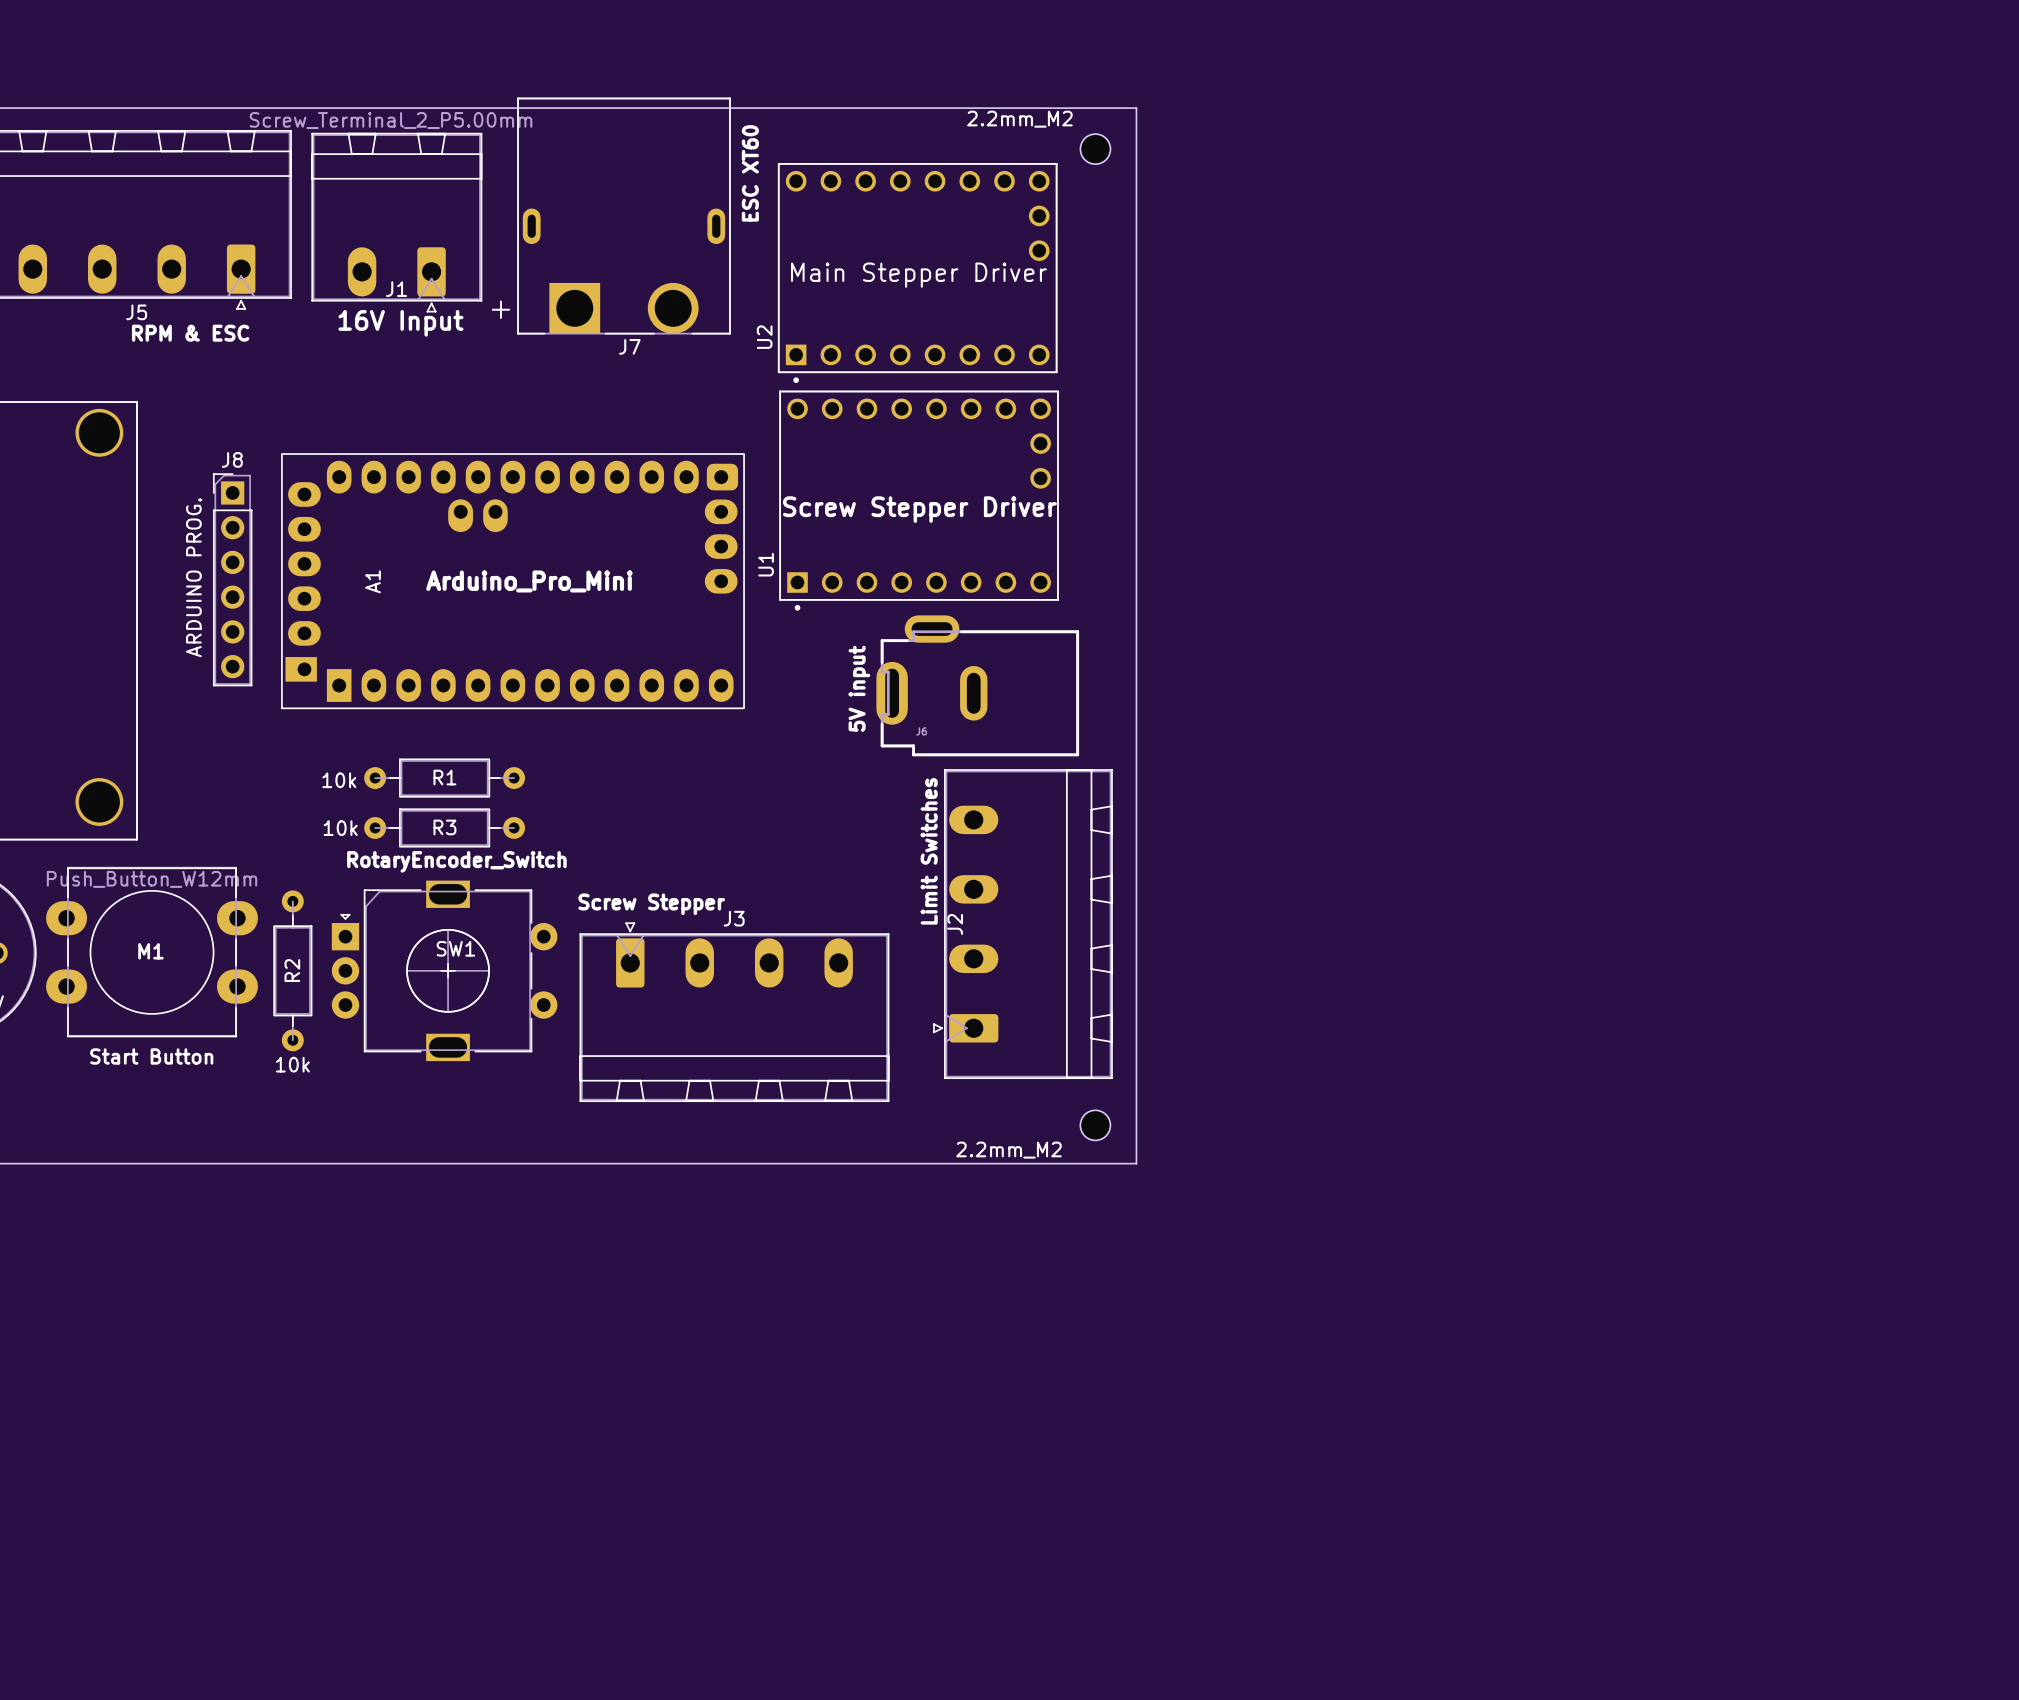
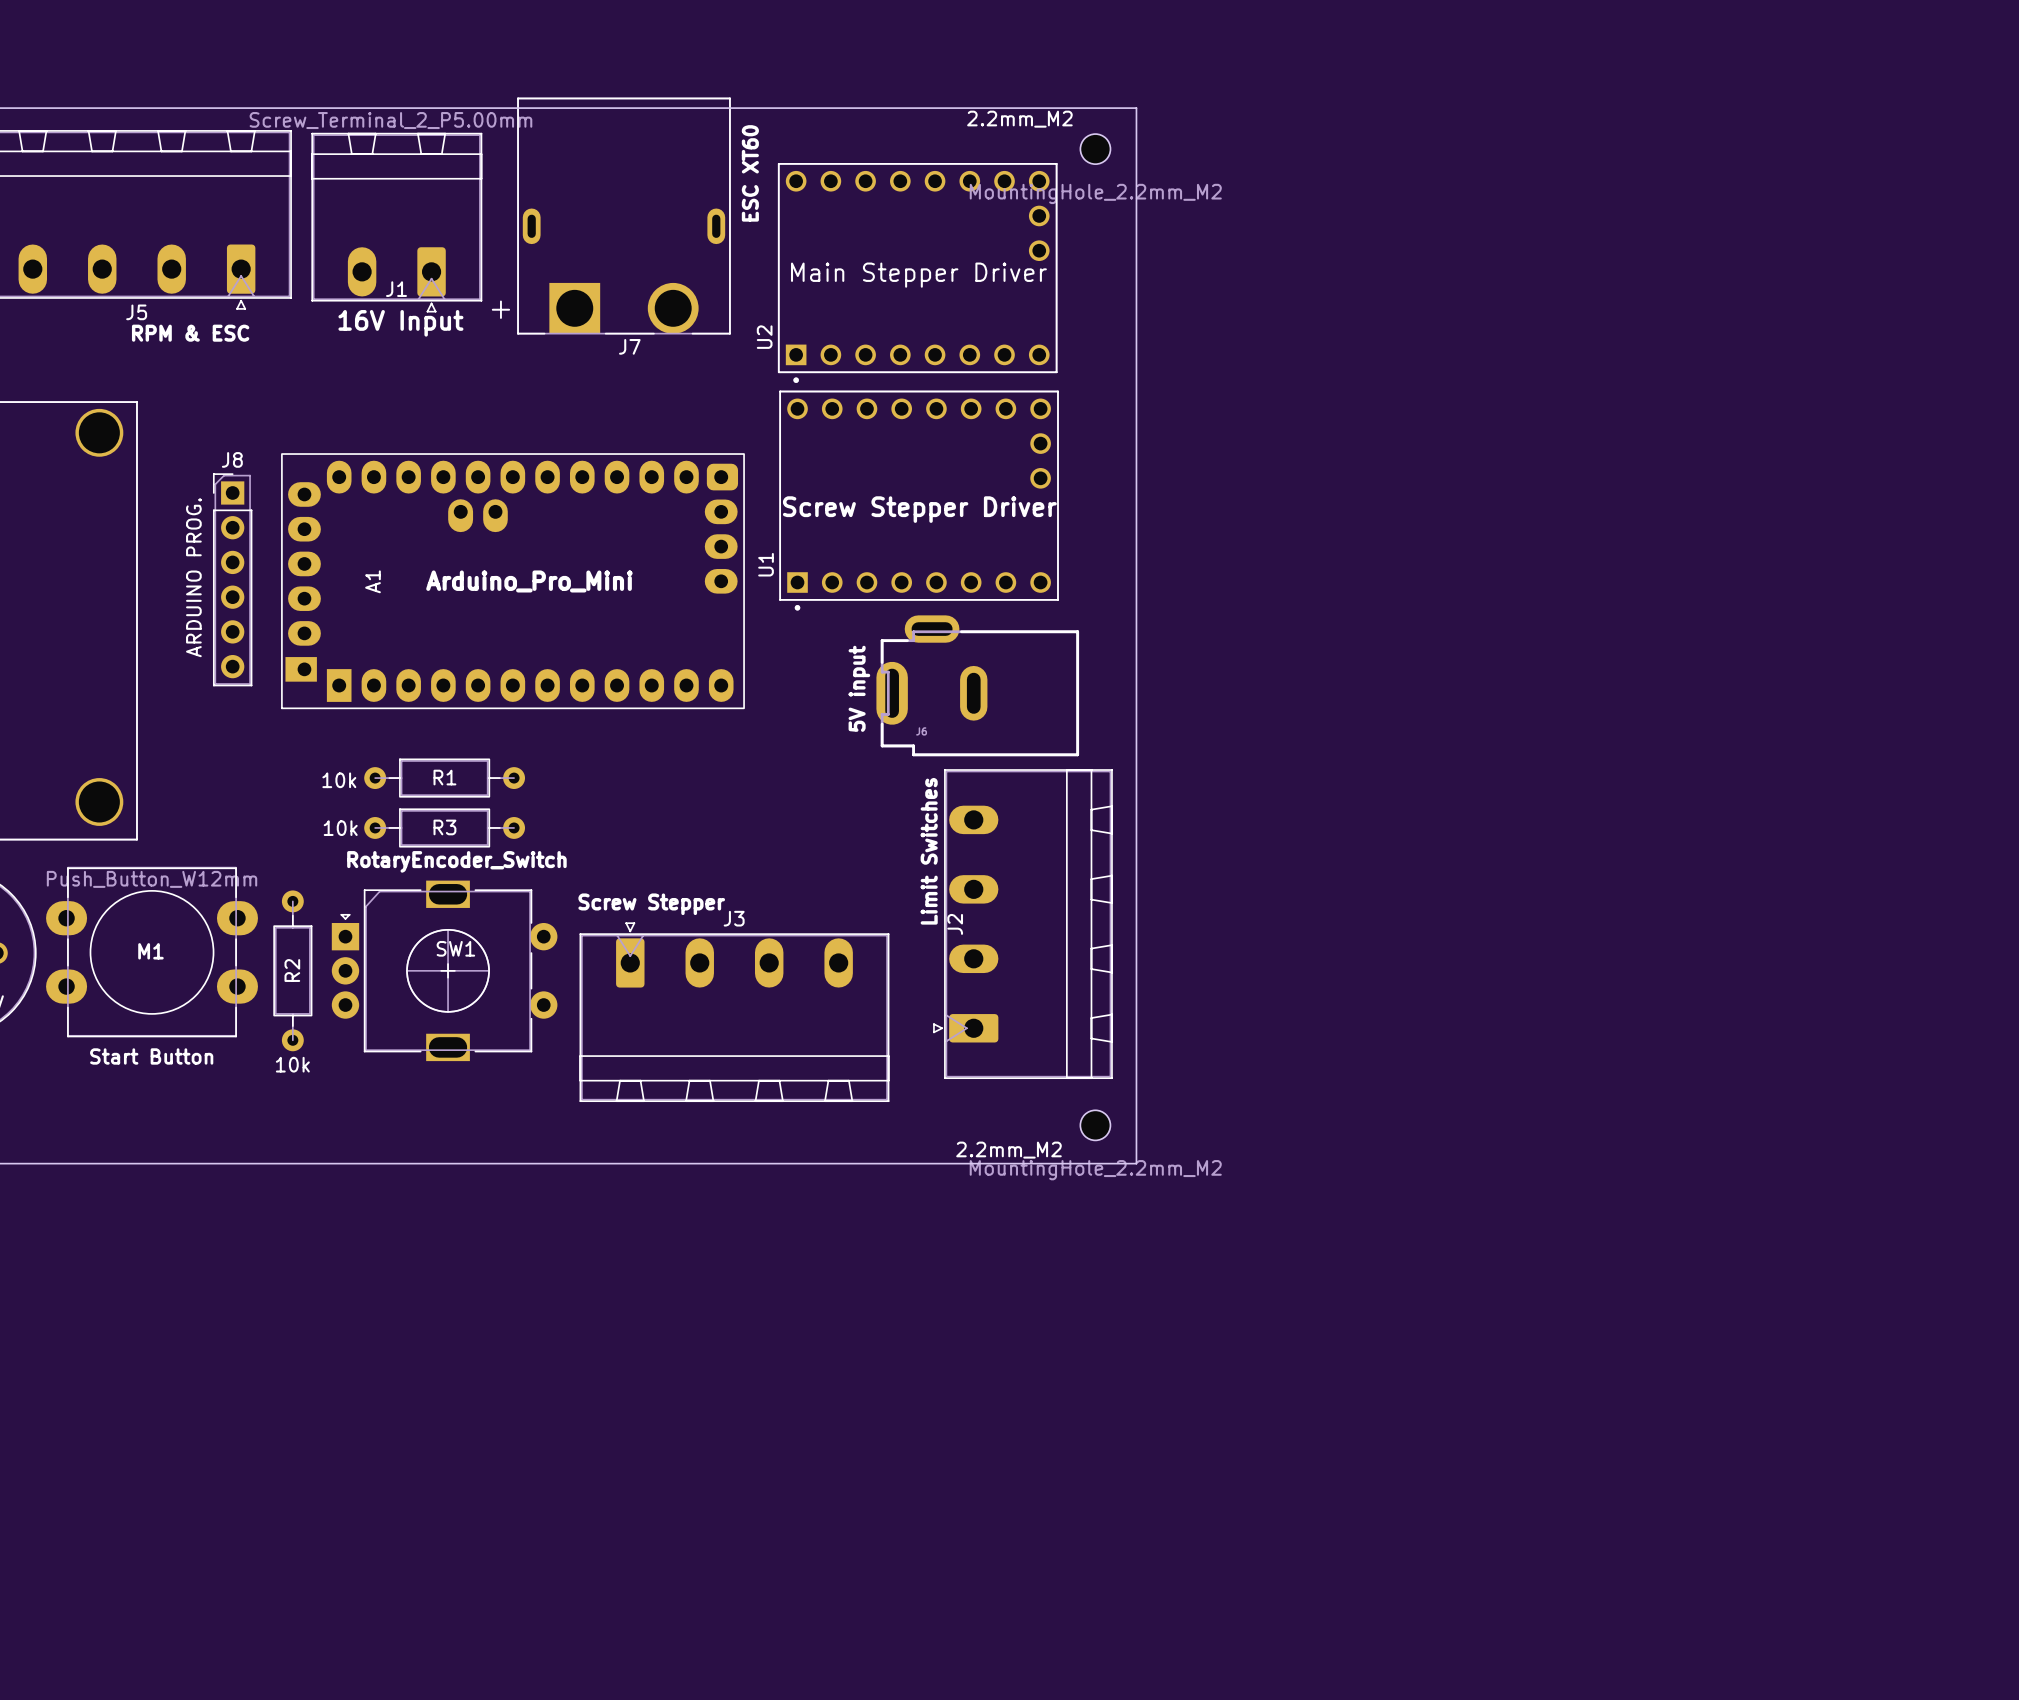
2.2mm_M2 value: none -> MountingHole_2.2mm_M2 (1095, 193)
2.2mm_M2 value: none -> MountingHole_2.2mm_M2 (1095, 1170)

